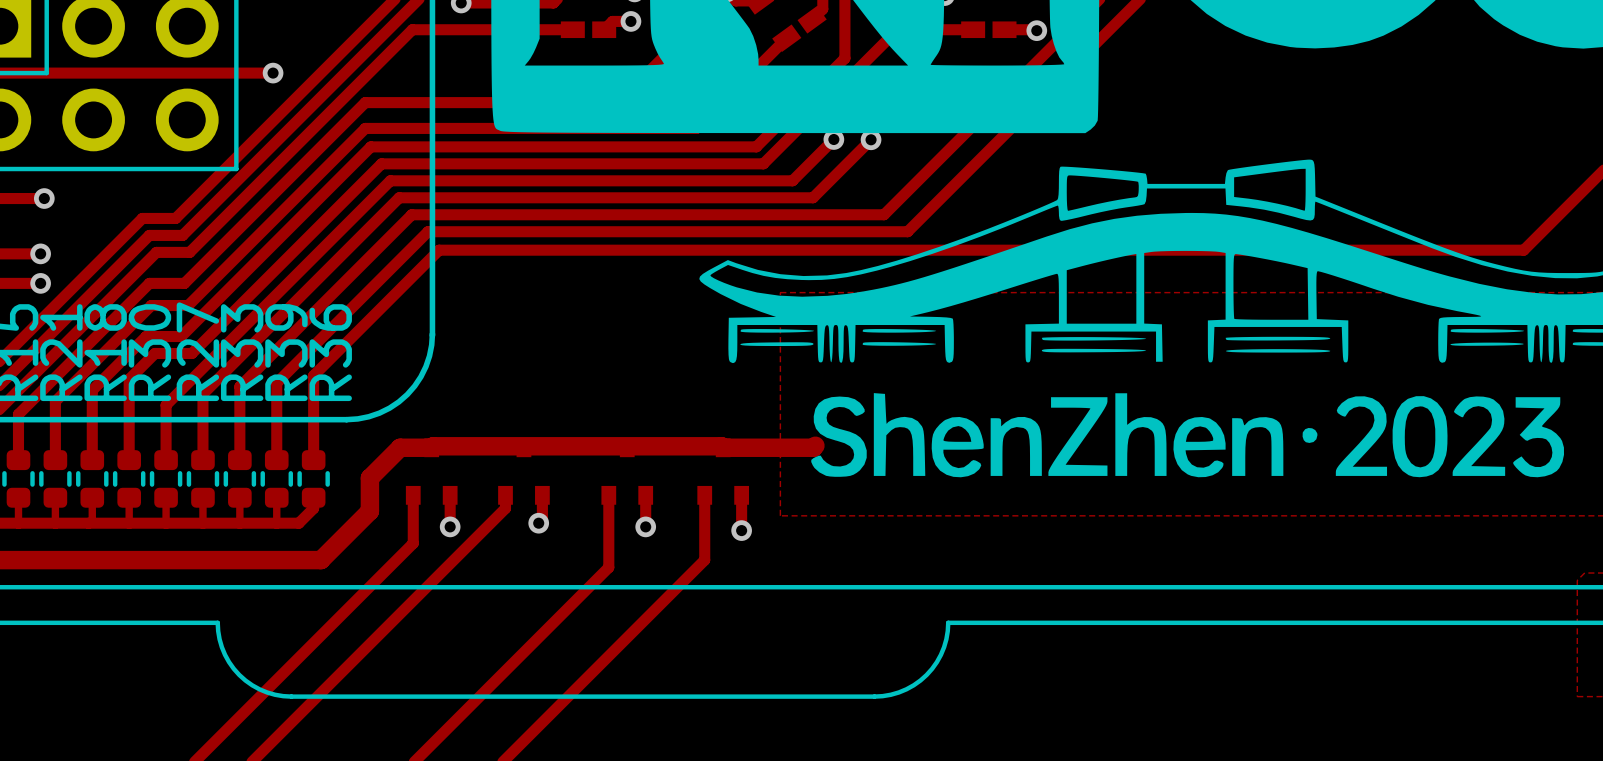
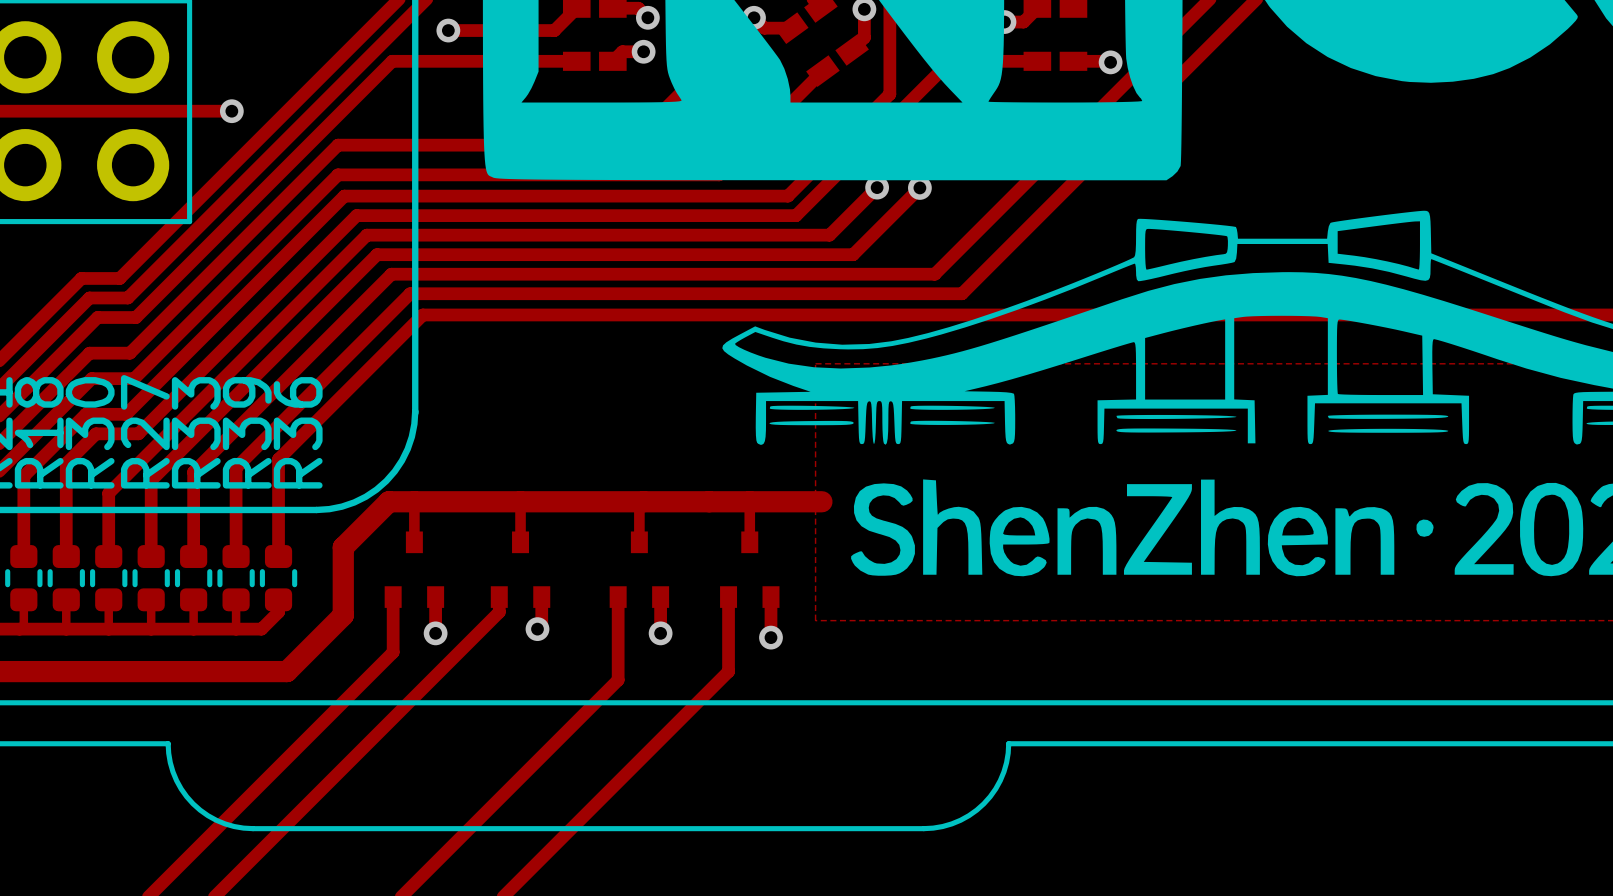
track: none -> (414, 501) (414, 542)
track: none -> (520, 501) (520, 542)
track: none -> (643, 501) (639, 506) (639, 542)
track: none -> (749, 501) (749, 542)
track: (815, 445) (813, 447) (400, 447) (369, 478) -> (821, 501) (388, 501) (343, 547) (343, 577)

